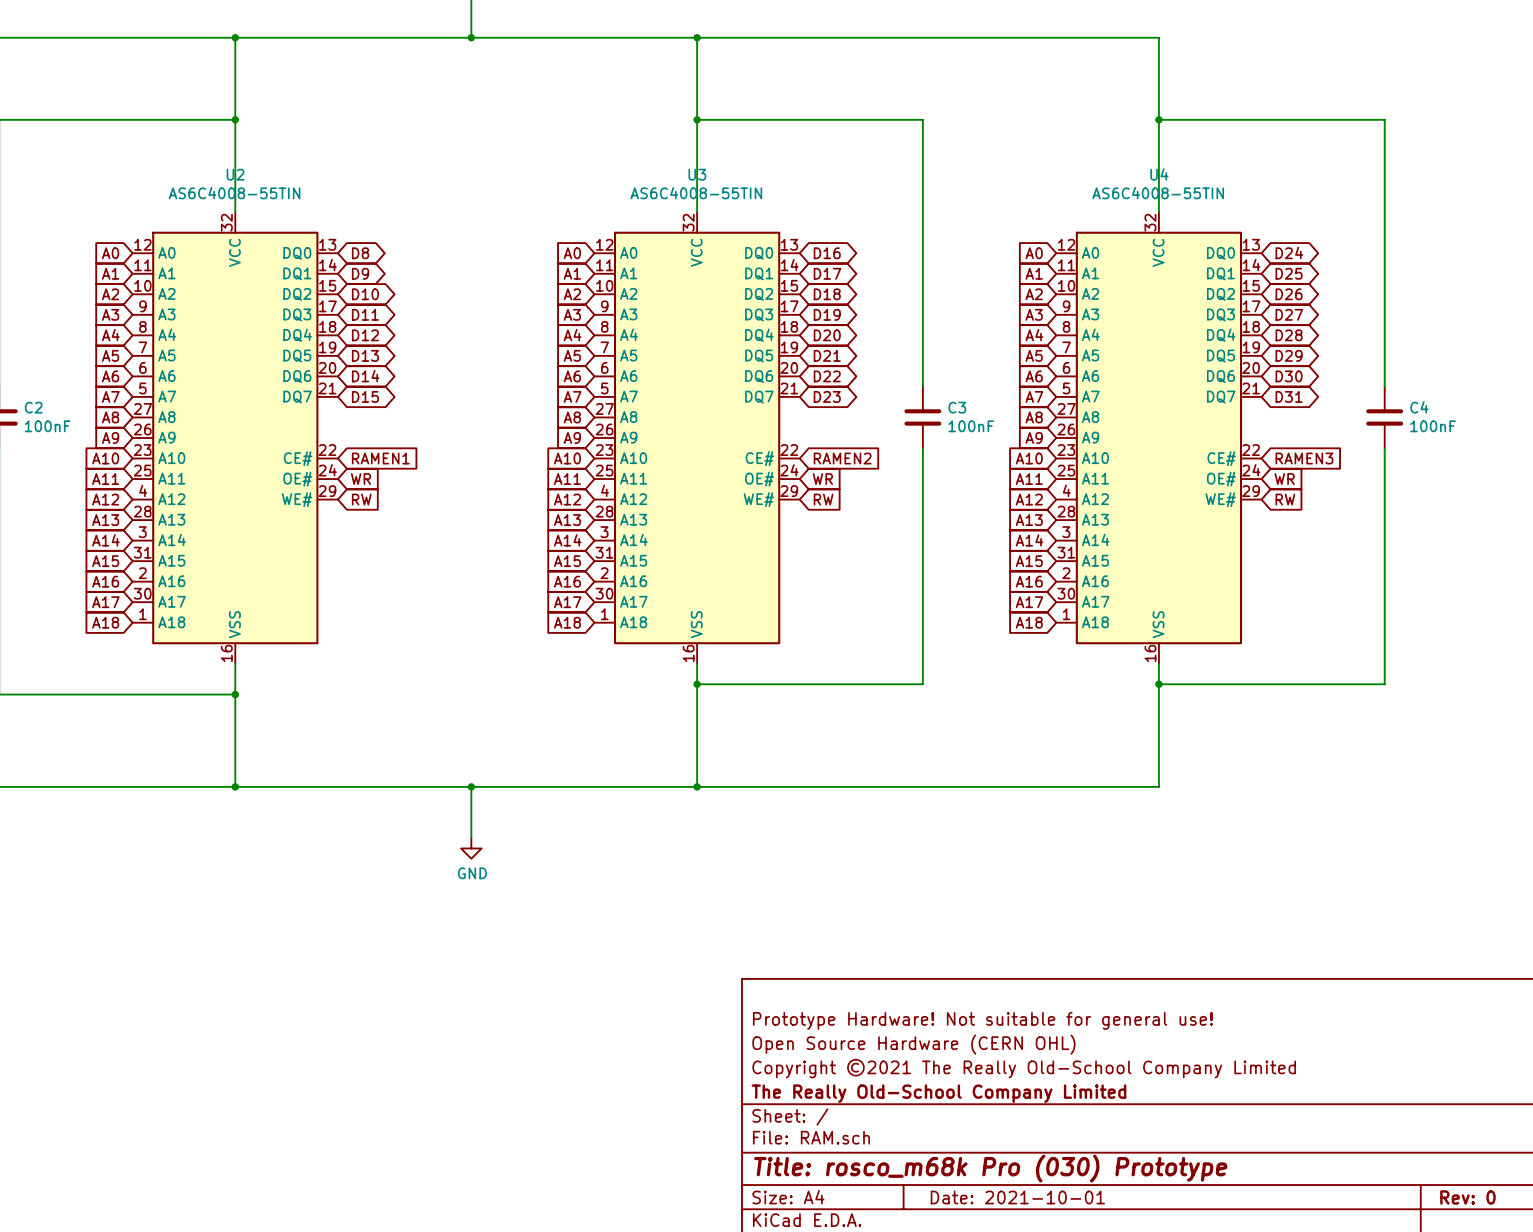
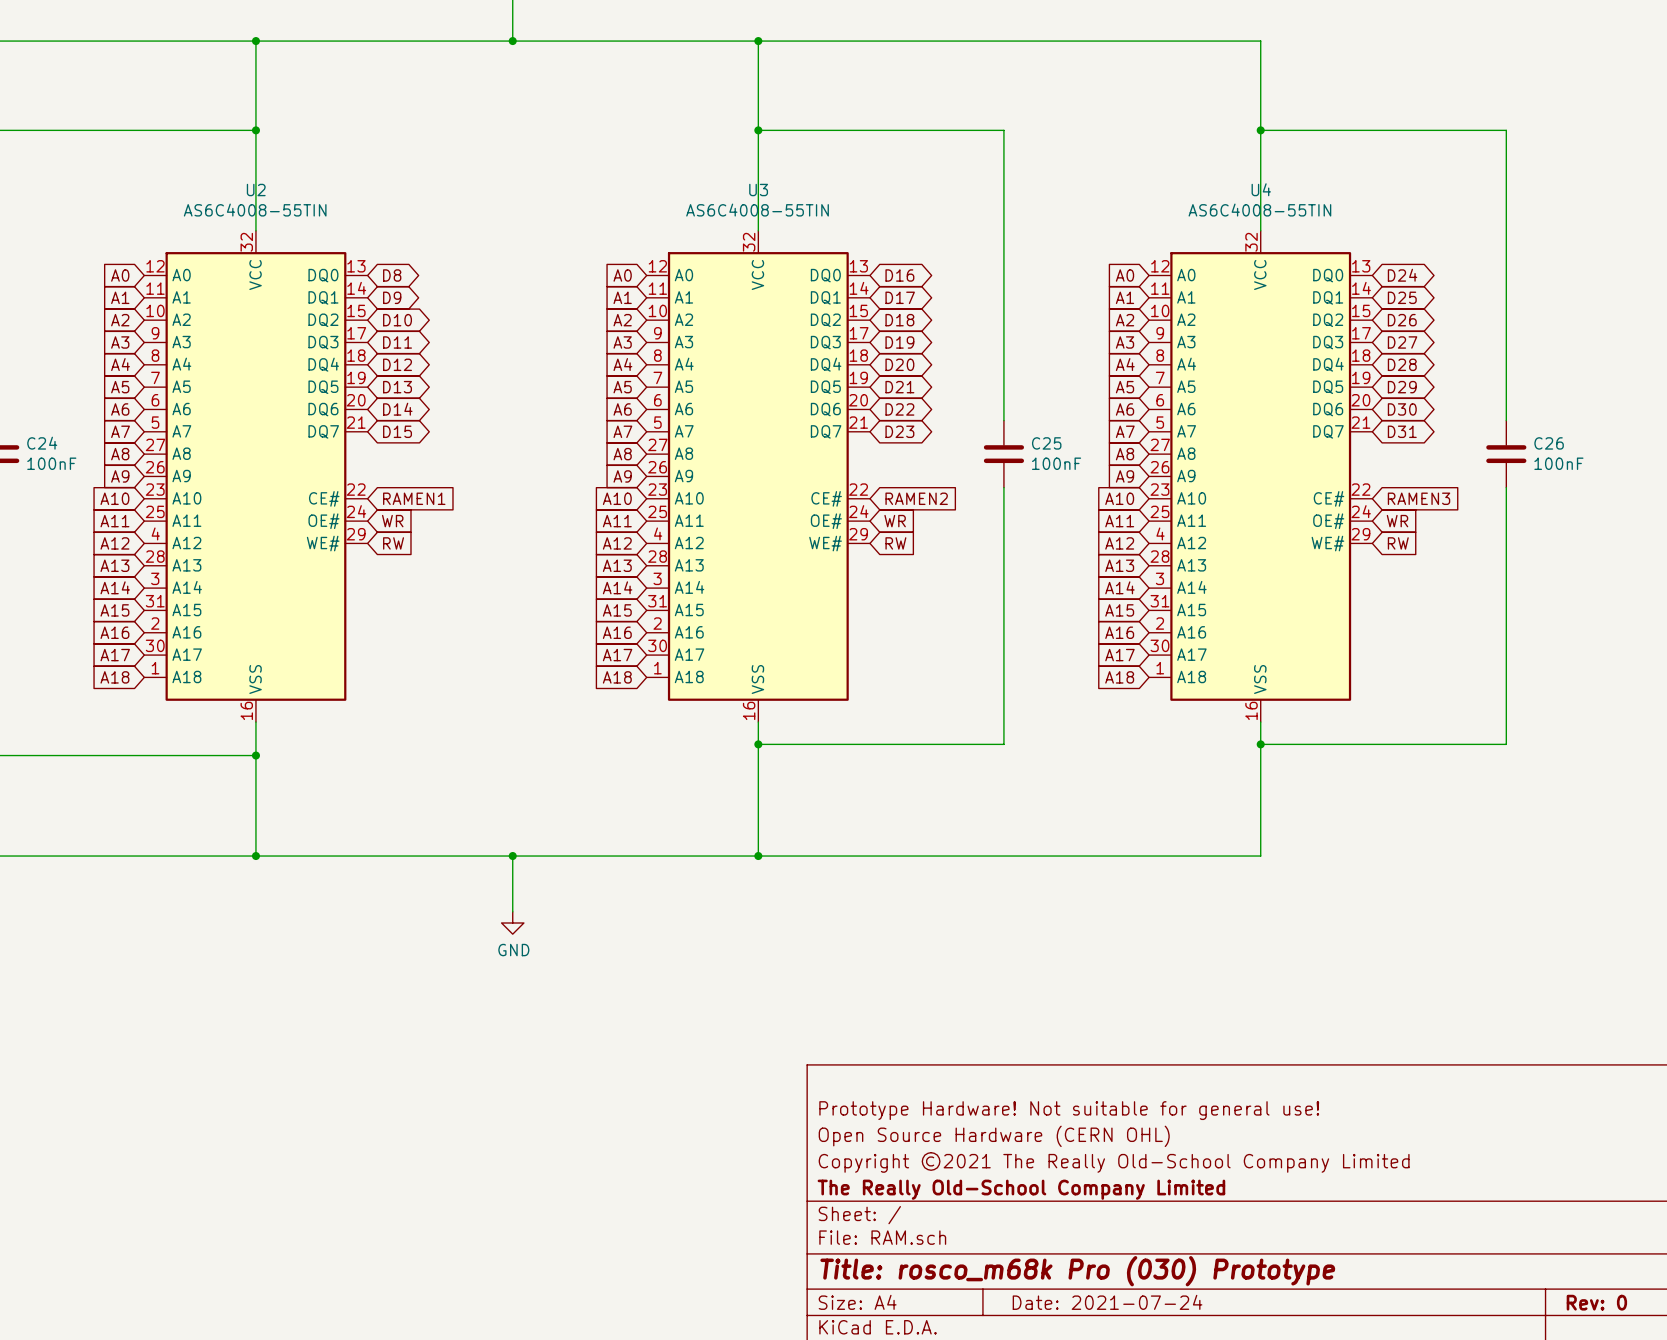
C2 name: C2 (33, 407) -> C24 (42, 443)
C3 name: C3 (957, 407) -> C25 (1046, 443)
C4 name: C4 (1419, 407) -> C26 (1549, 443)
title block: Date: 2021-10-01 (1017, 1197) -> Date: 2021-07-24 (1107, 1302)

